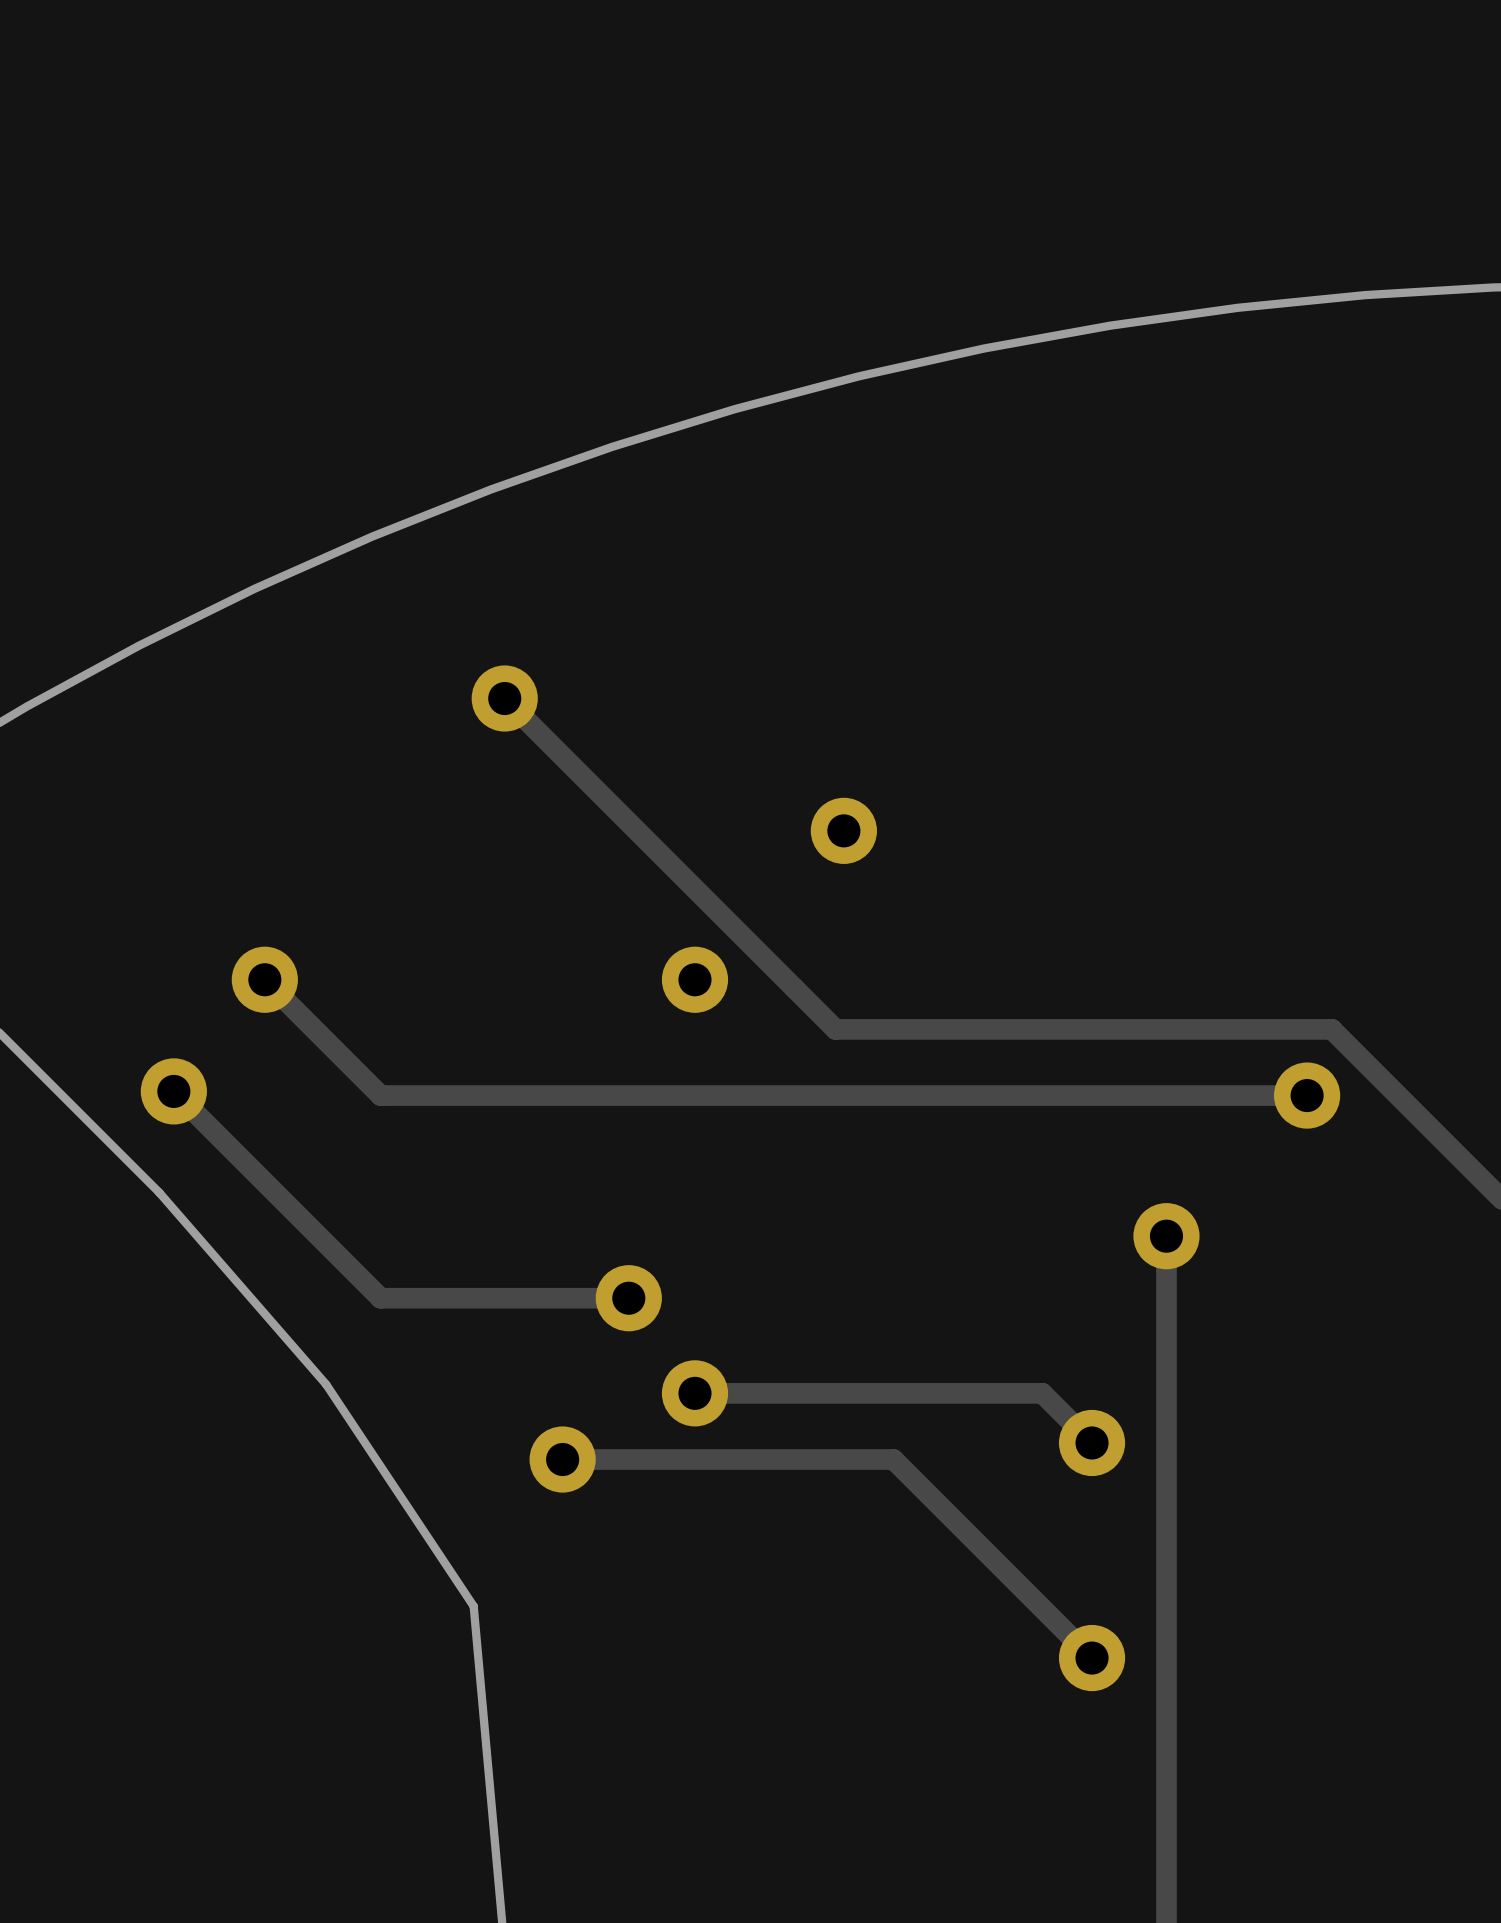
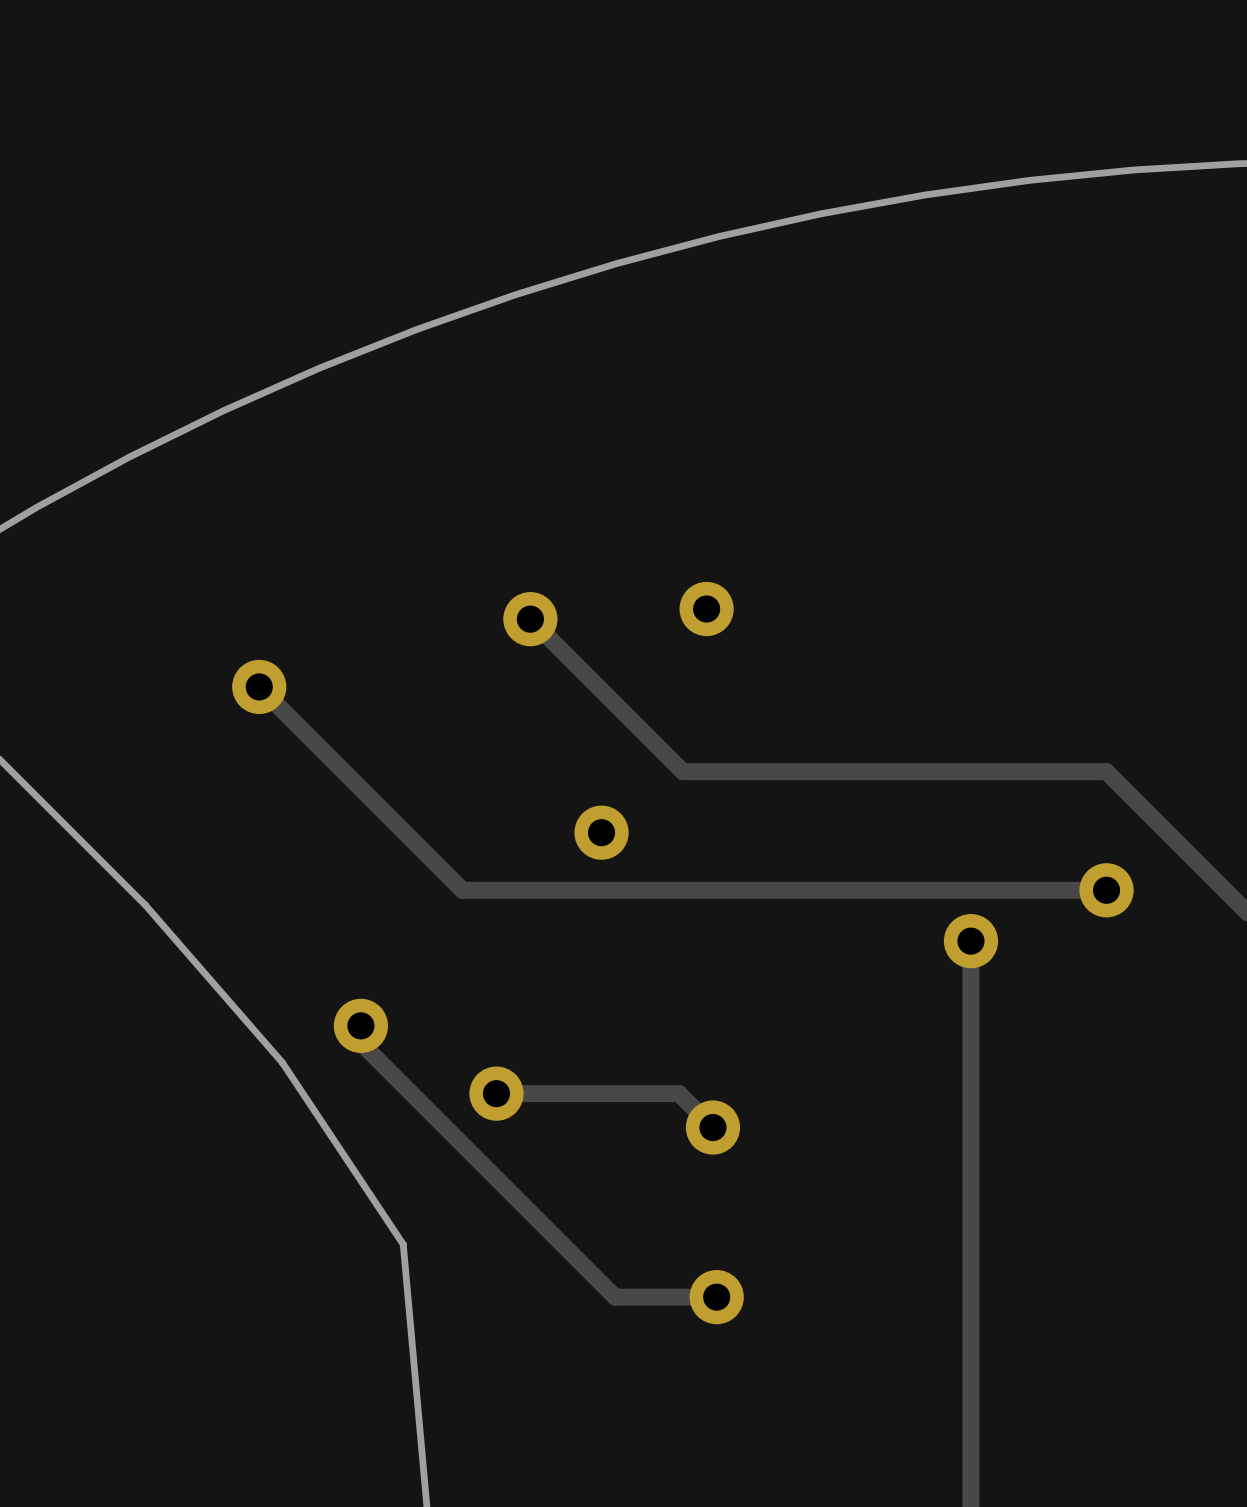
track: (504, 698) (835, 1029) -> (530, 619) (682, 771) (699, 771)
via: (504, 698) -> none
via: none -> (530, 619)
track: none -> (259, 686) (462, 890) (1106, 890)
track: (264, 979) (380, 1095) (1307, 1095) -> none
via position: (264, 979) -> (259, 686)
via: (694, 979) -> none
track: (173, 1091) (380, 1298) (628, 1298) -> none
via: (173, 1091) -> none
via position: (1307, 1095) -> (1106, 890)
via: none -> (601, 832)
via: (628, 1298) -> none
track: none -> (360, 1025) (360, 1042) (615, 1297) (716, 1297)
via: none -> (360, 1025)
track: (694, 1393) (1042, 1393) (1092, 1442) -> none
via: (694, 1393) -> none
track: none -> (496, 1093) (679, 1093) (712, 1127)
via: (1092, 1442) -> none
track: (562, 1459) (893, 1459) (1092, 1658) -> none
via position: (562, 1459) -> (496, 1093)
via: none -> (712, 1127)
via: (1092, 1658) -> none
via: none -> (716, 1297)

